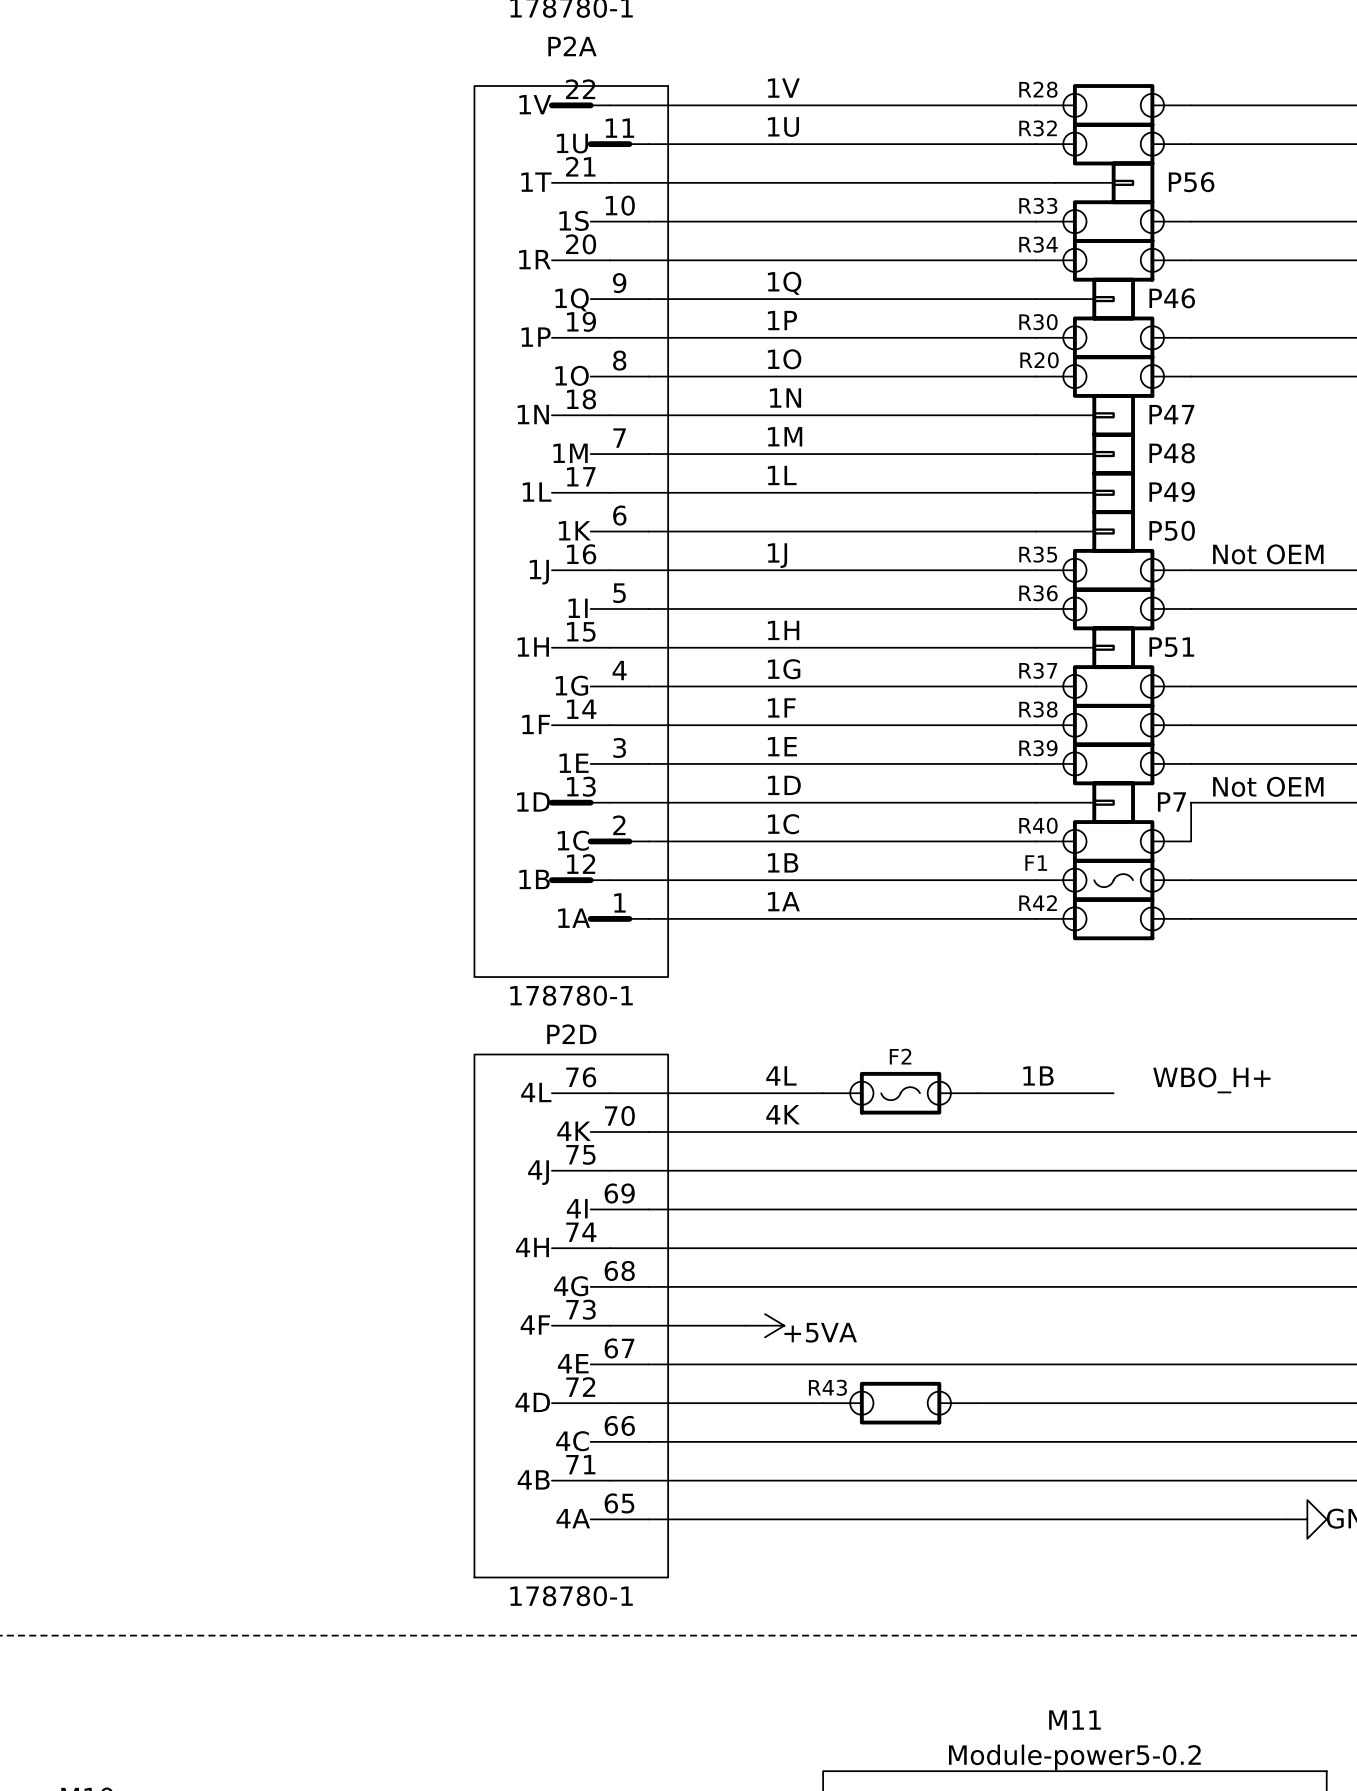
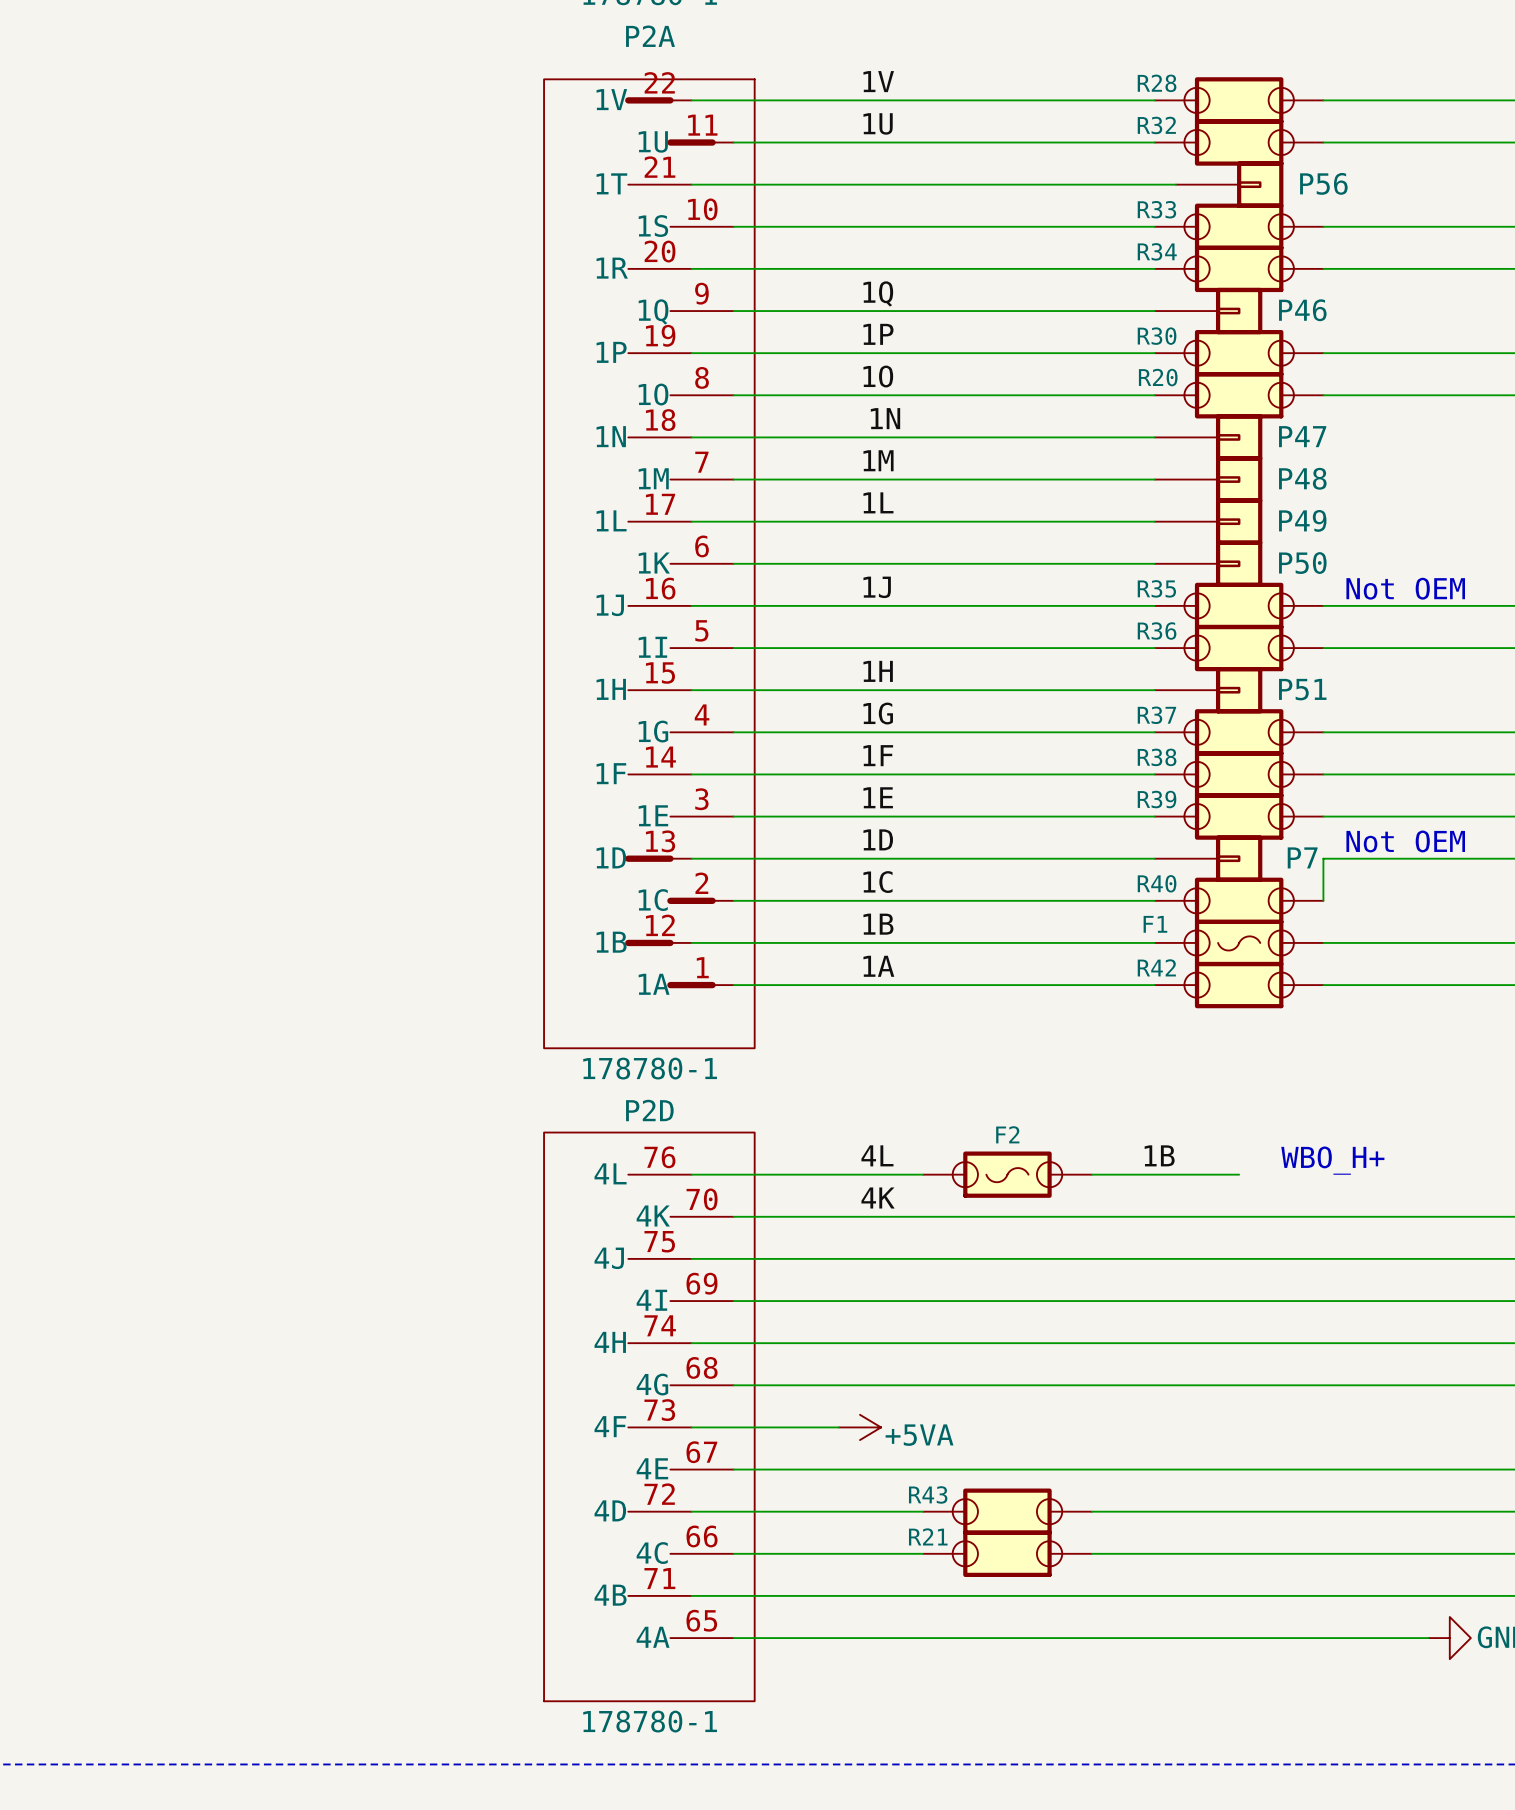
R21: none -> (1007, 1553)

